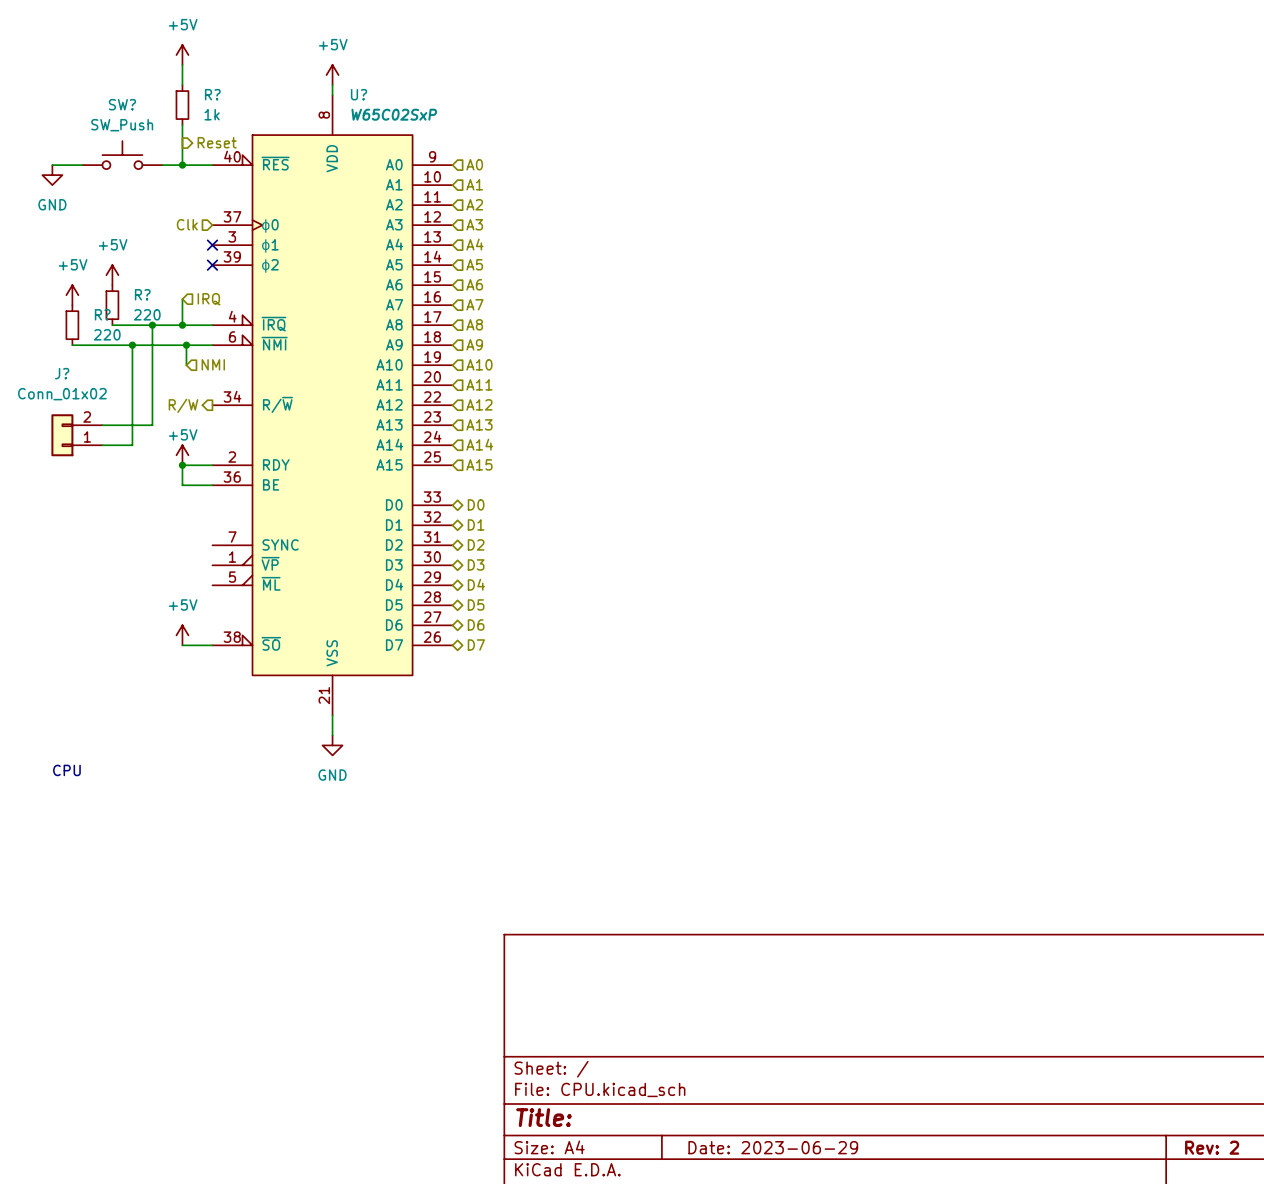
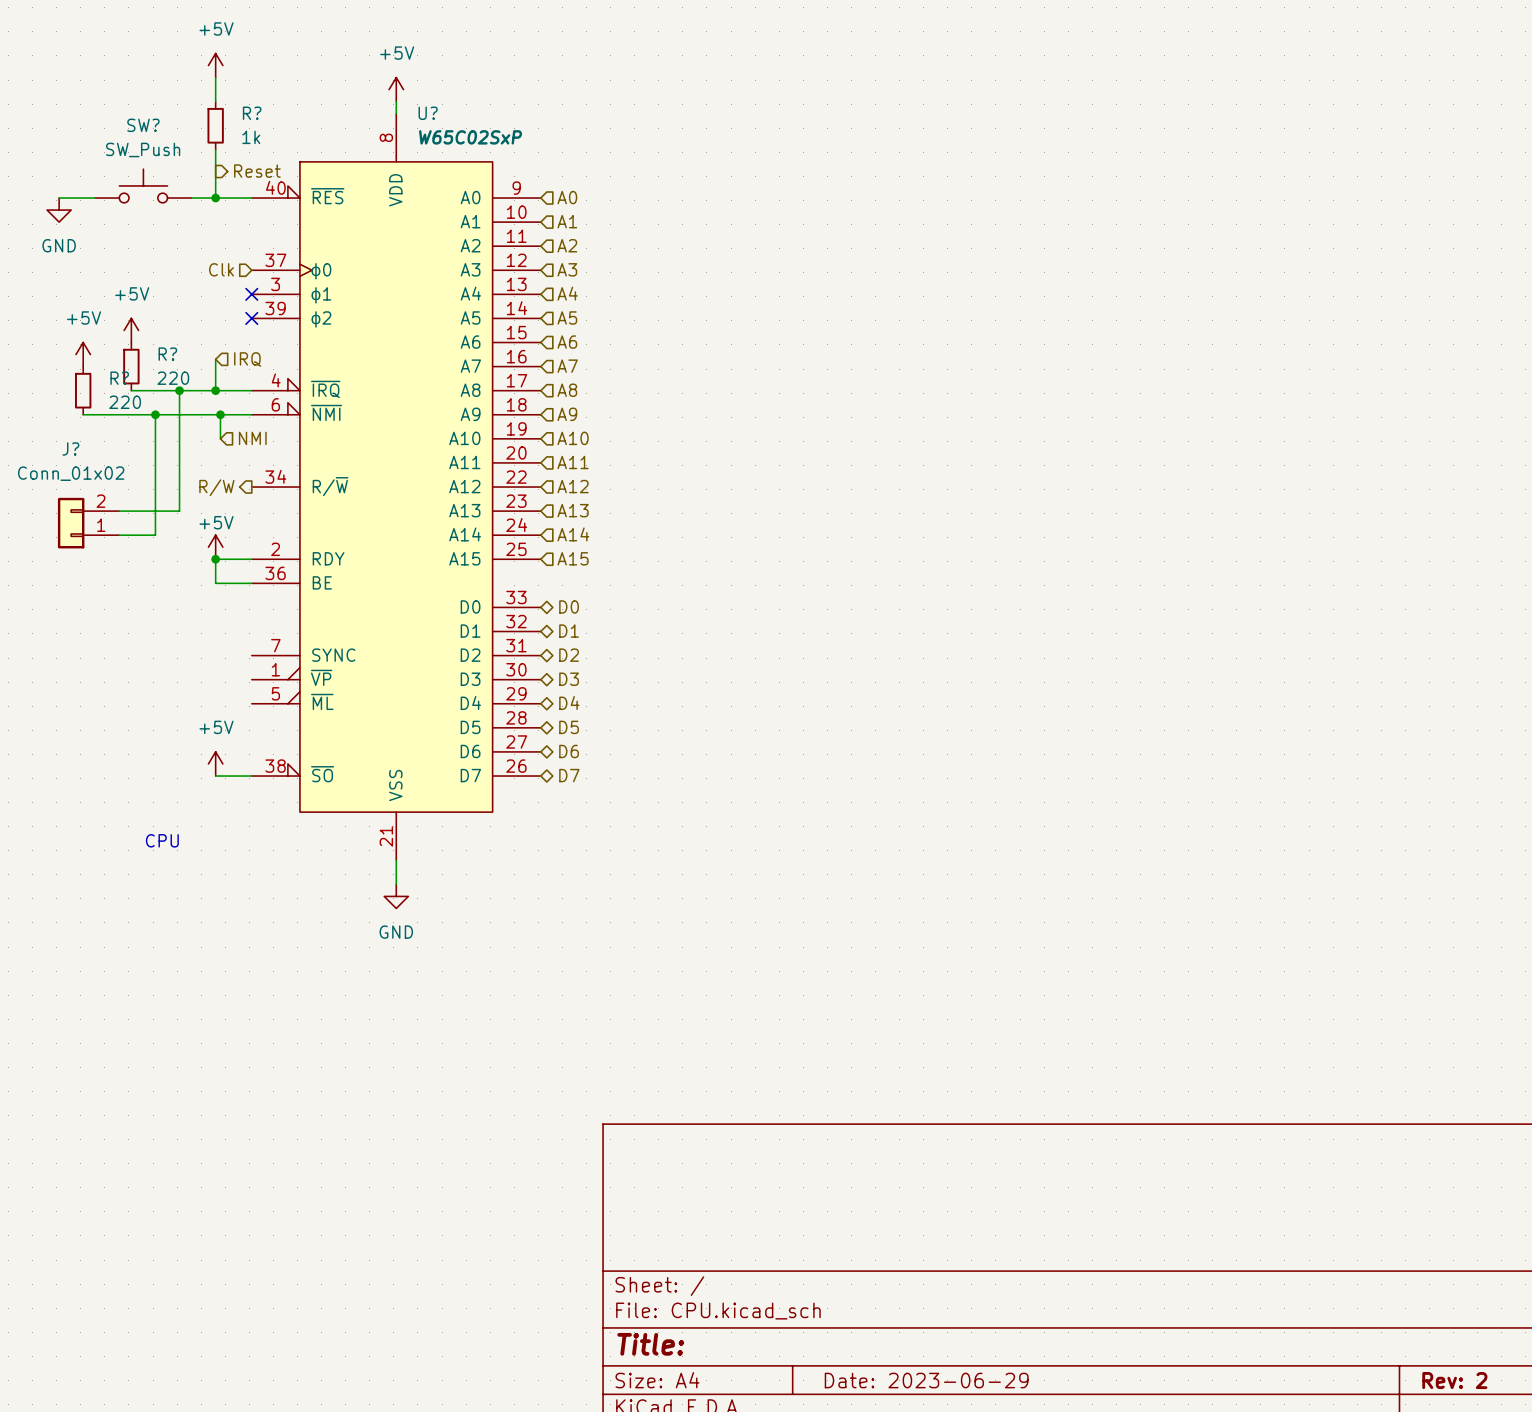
text position: CPU (66, 770) -> CPU (162, 840)

